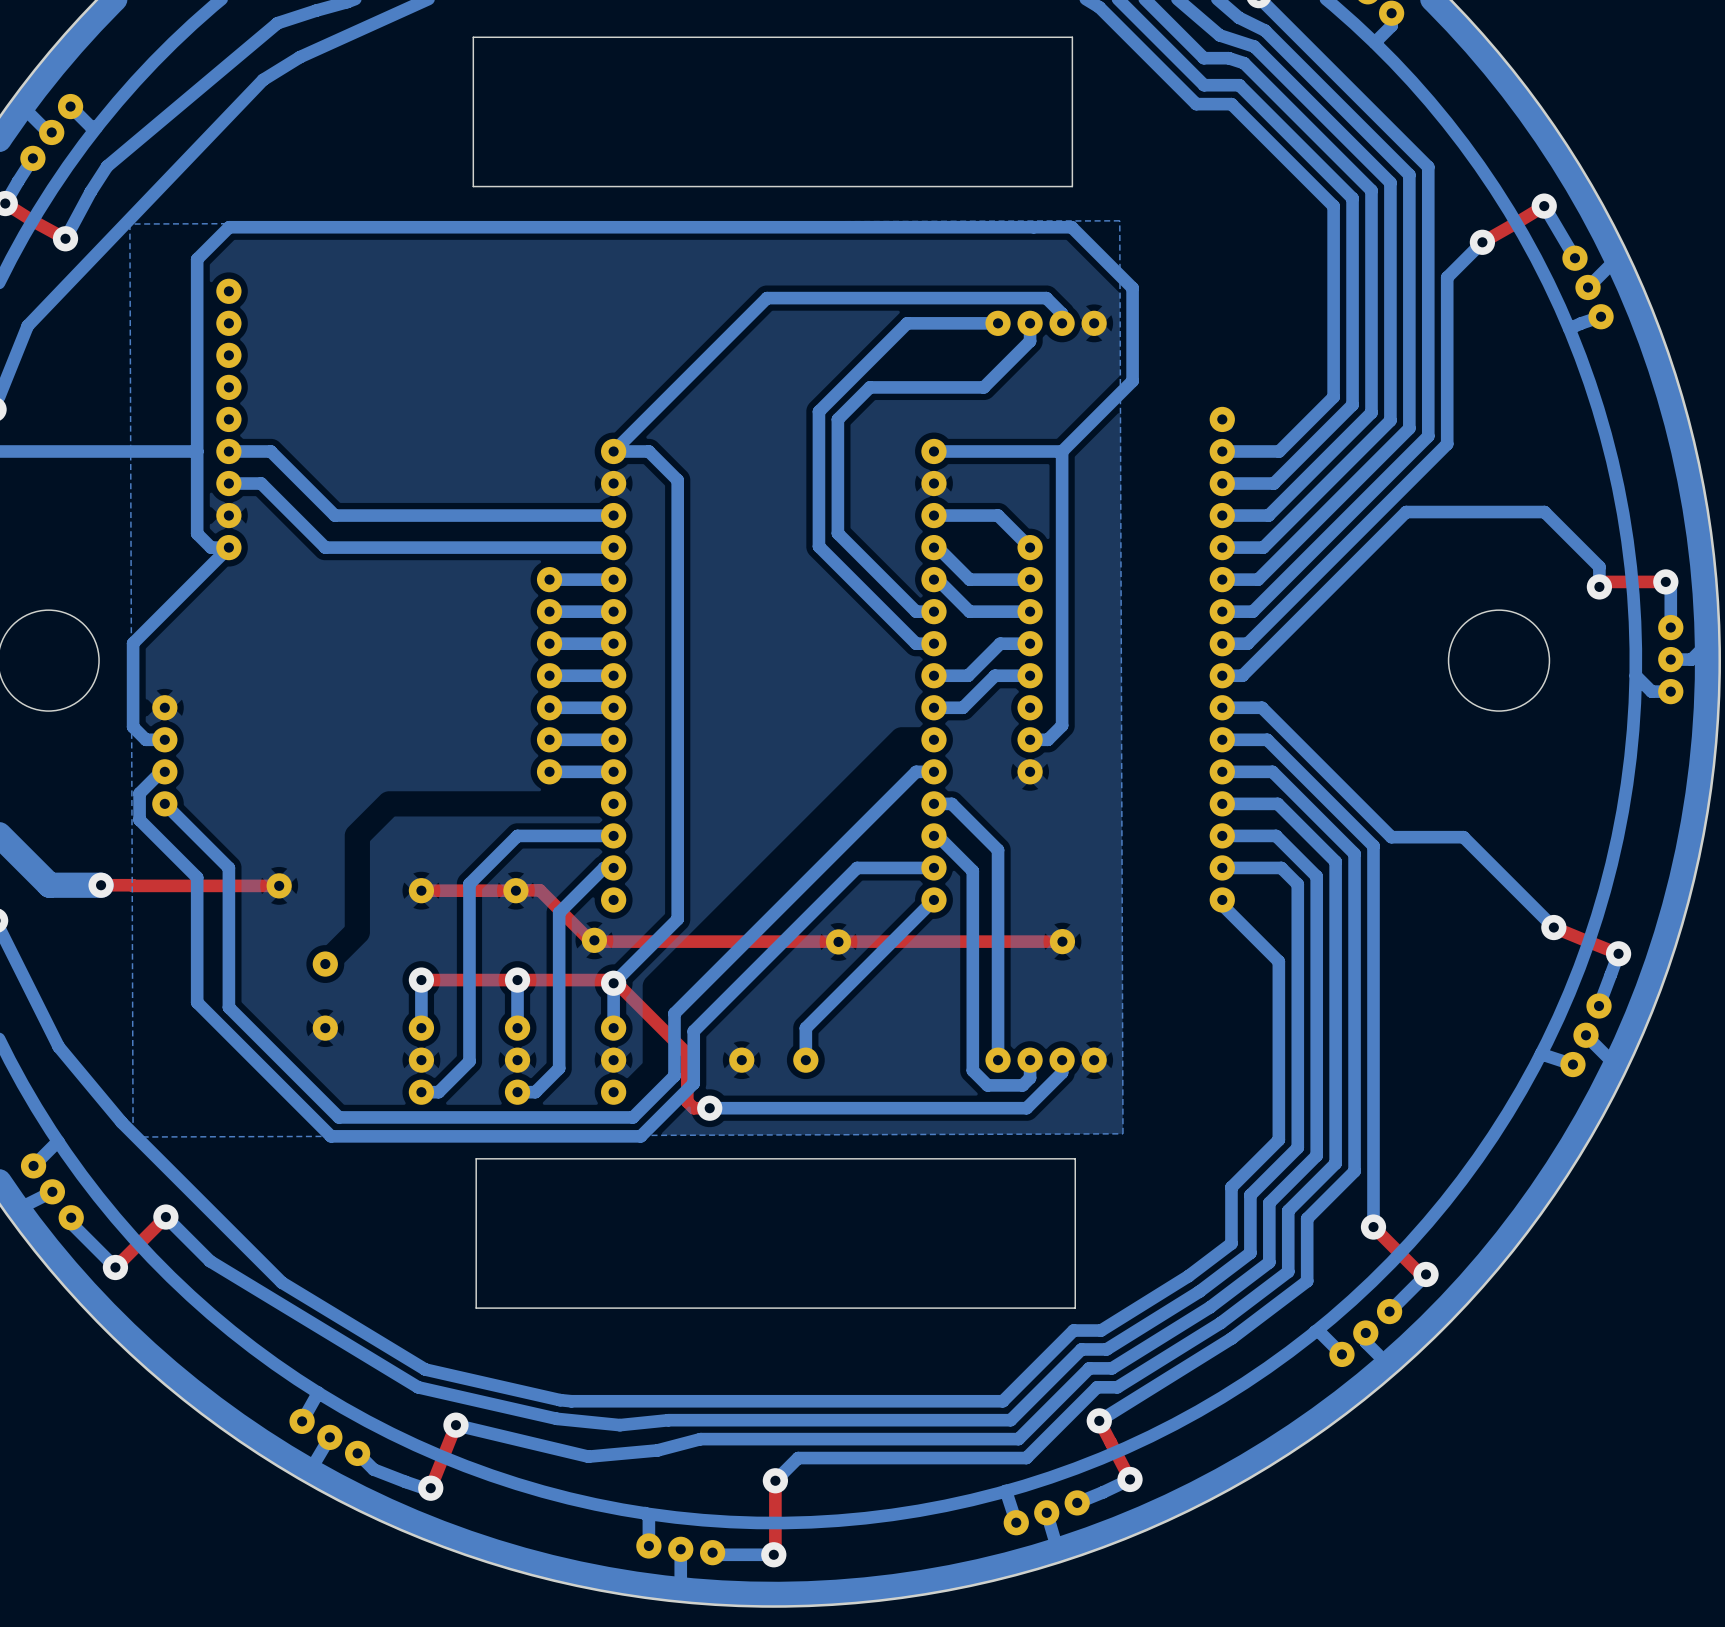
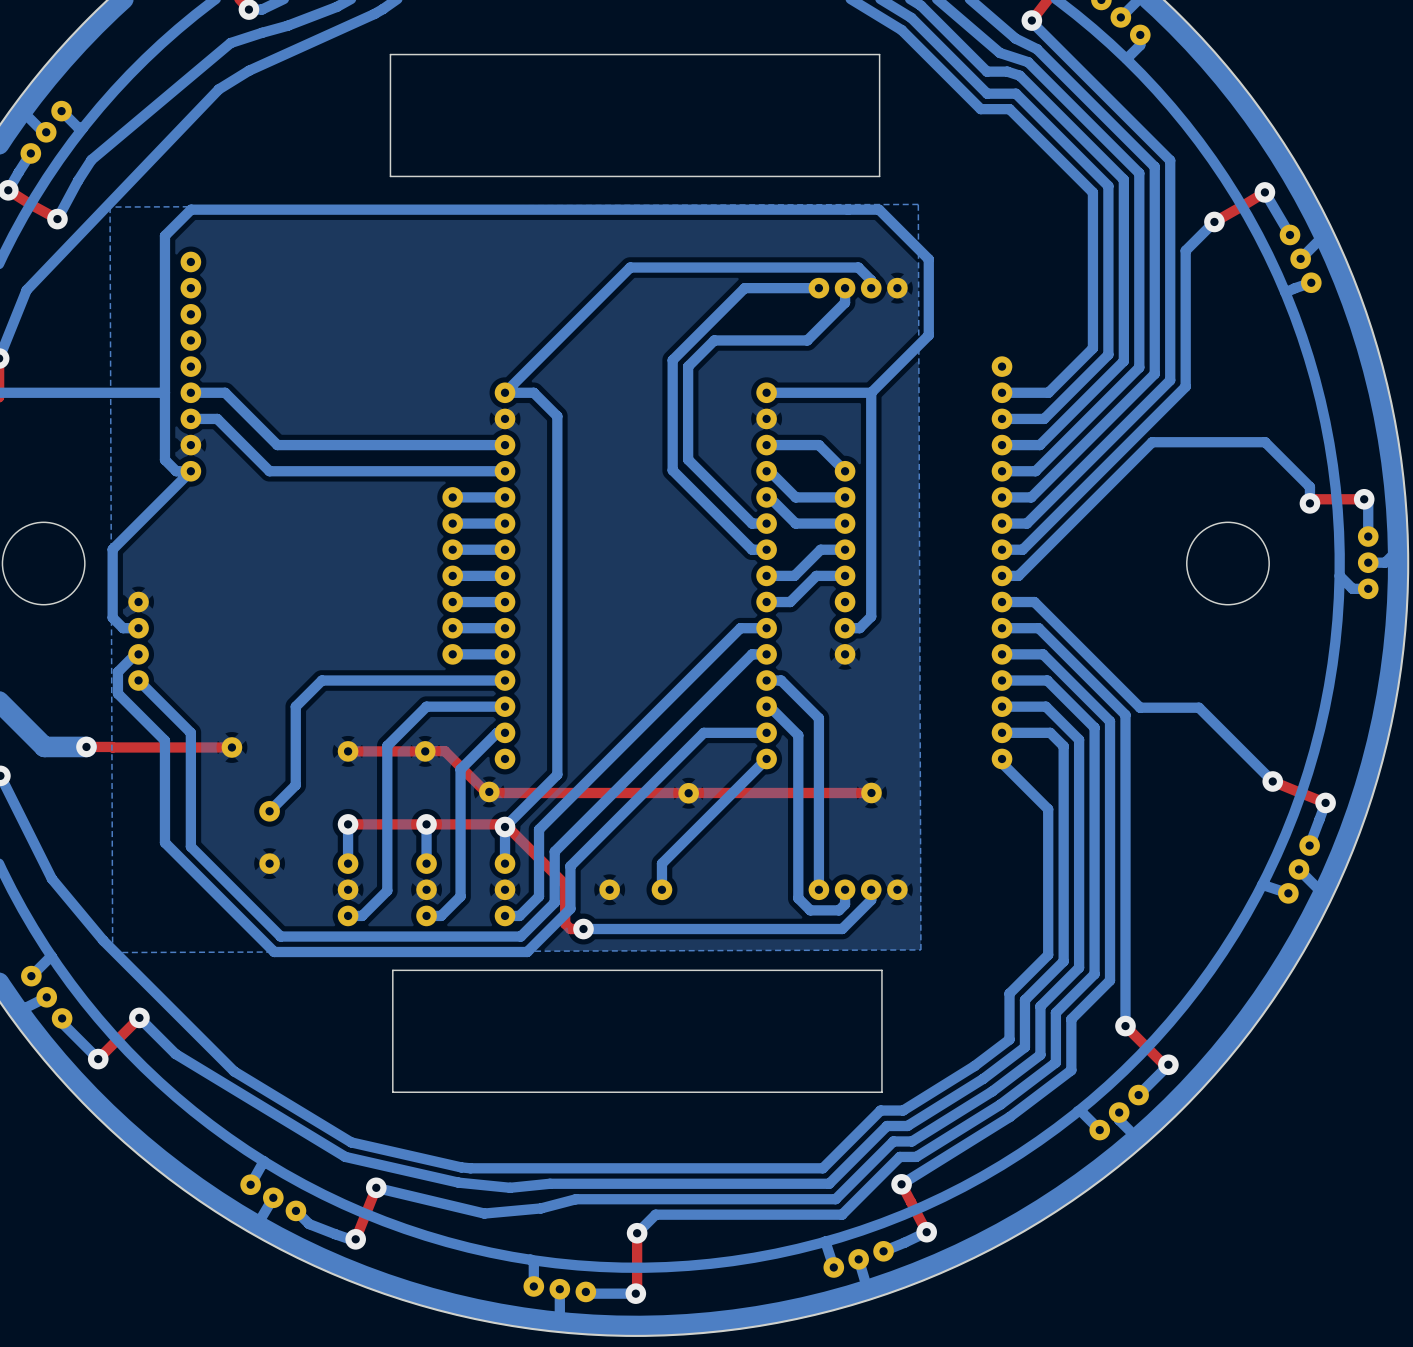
bottom track: none -> (766, 628) (740, 628) (539, 829) (539, 896) (519, 915) (505, 915)
bottom track: none -> (505, 680) (321, 680) (295, 706) (295, 785) (269, 811)

